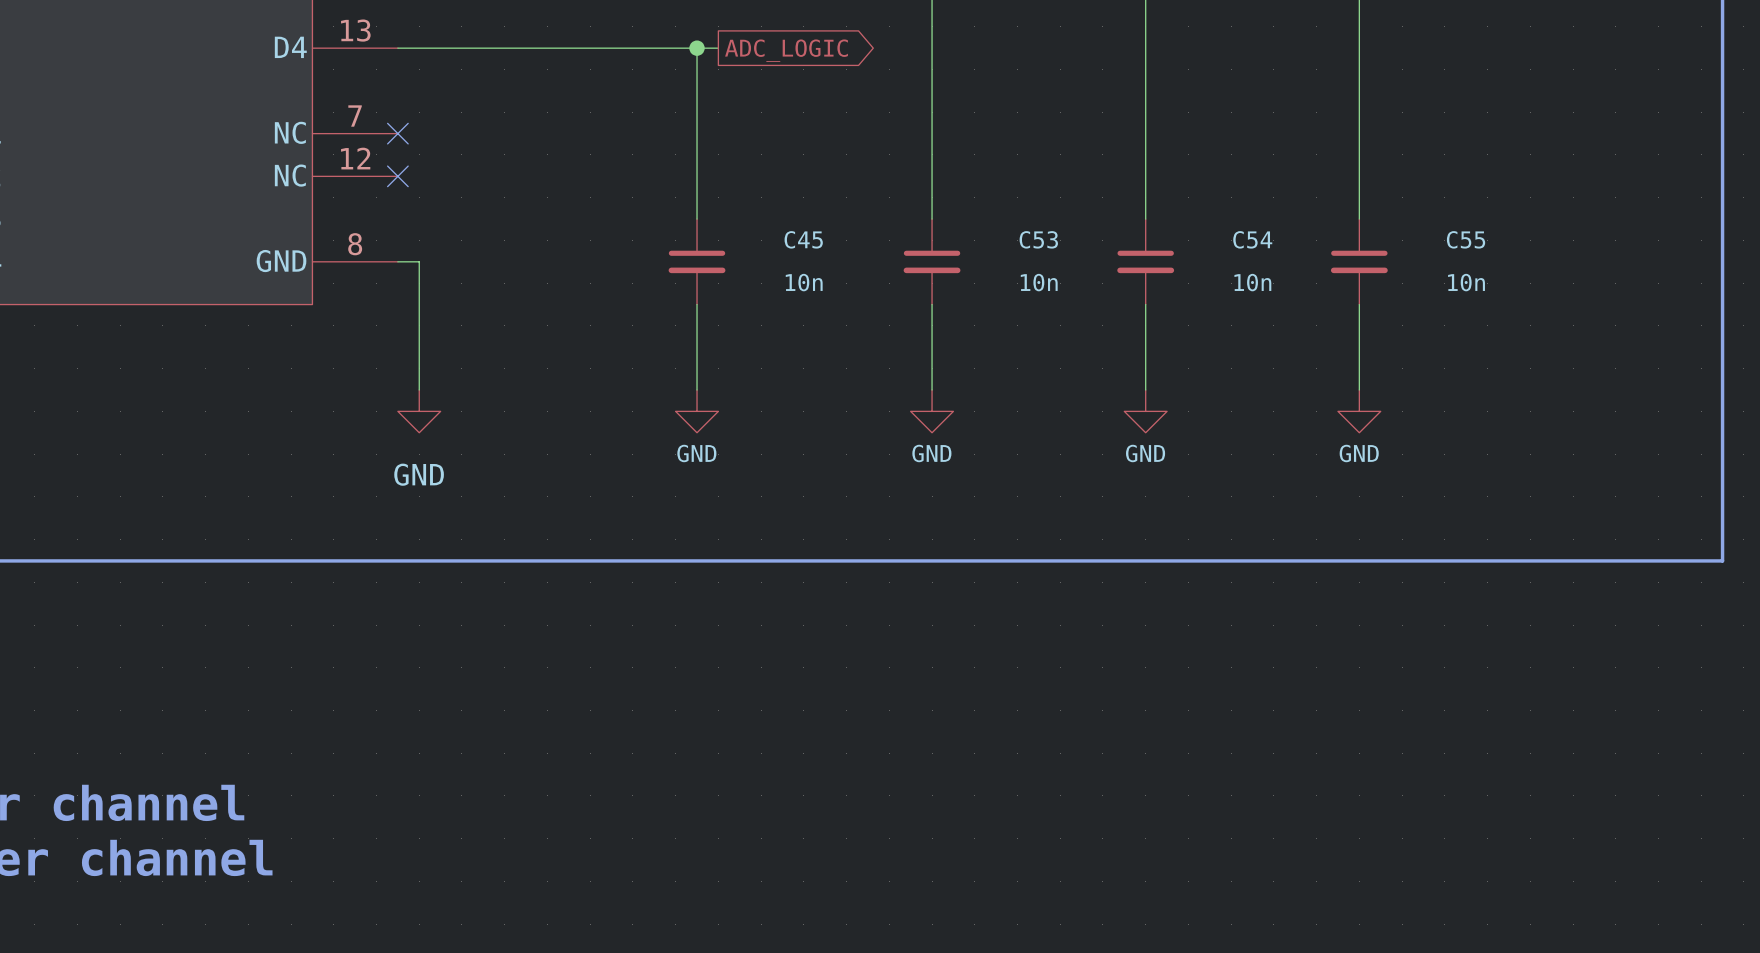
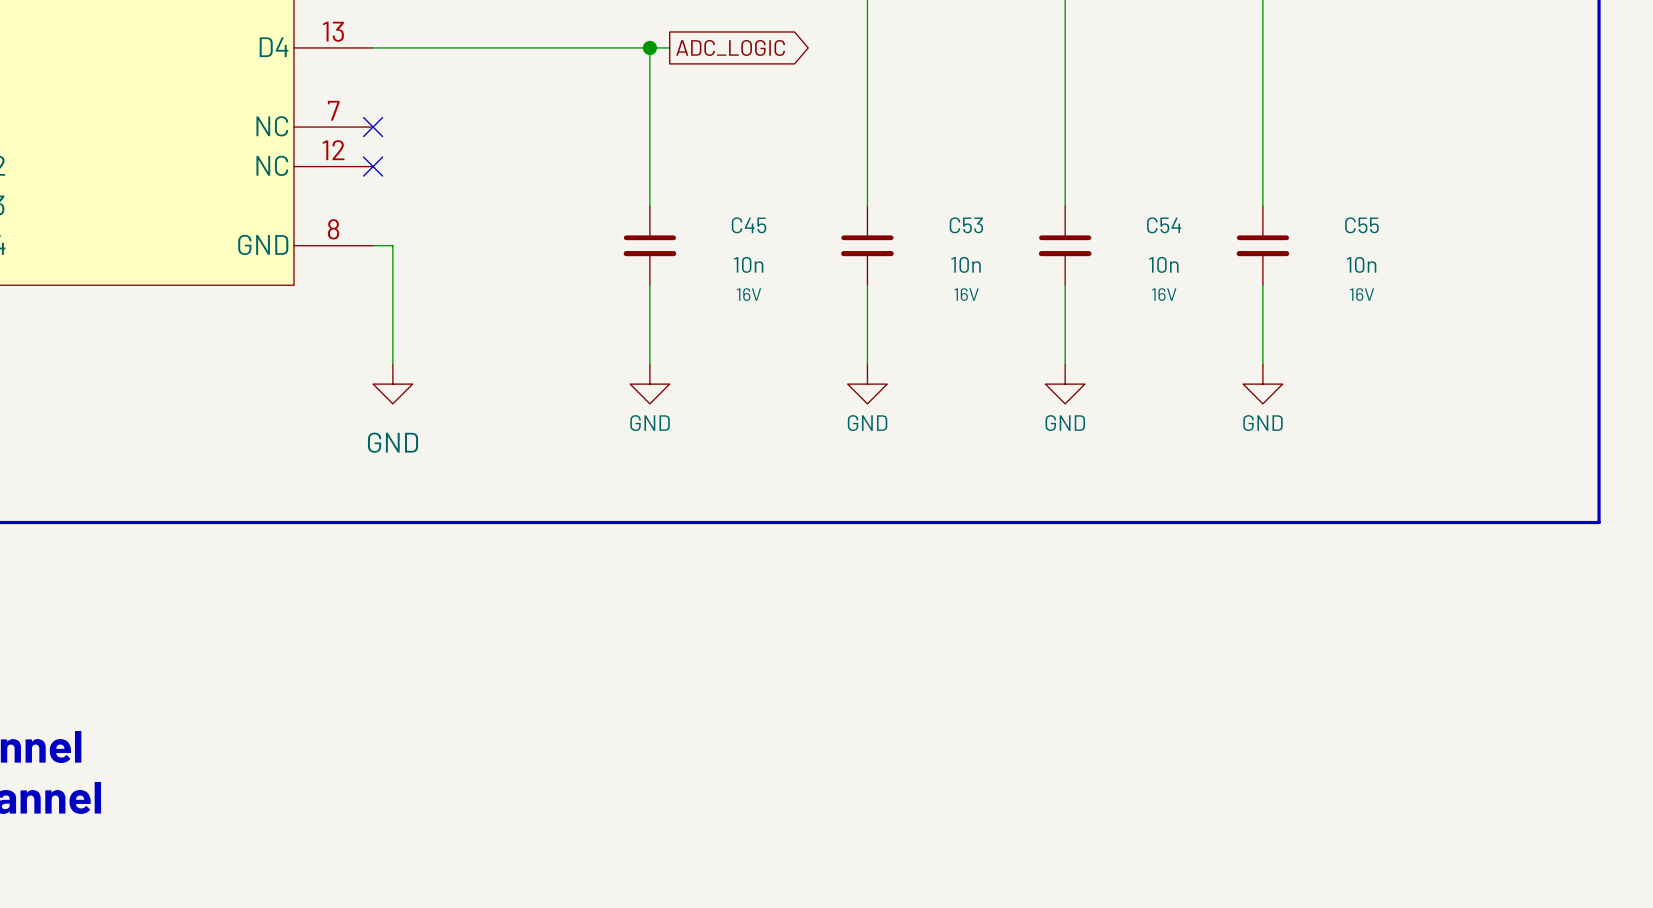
C45 text: none -> 16V (749, 294)
C53 text: none -> 16V (966, 294)
C54 text: none -> 16V (1164, 294)
C55 text: none -> 16V (1362, 294)

